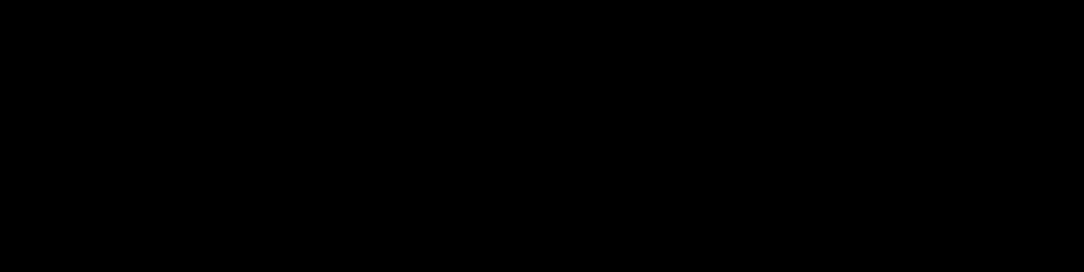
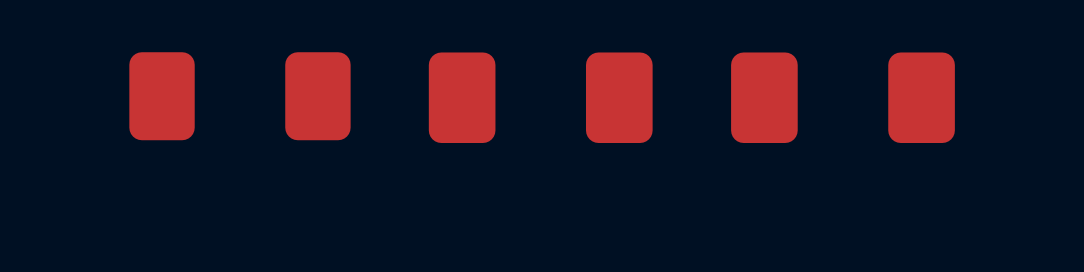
part: none -> (239, 96)
part: none -> (540, 97)
part: none -> (842, 97)

